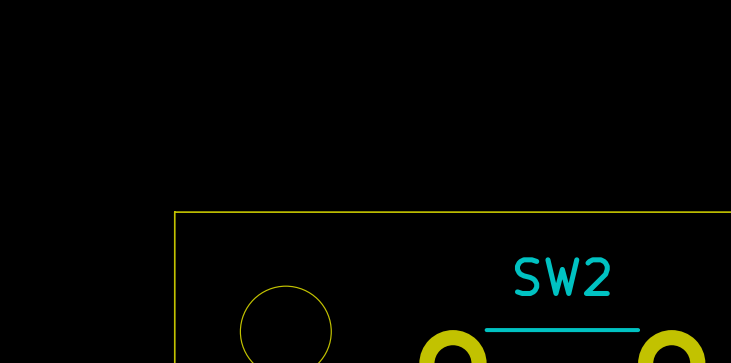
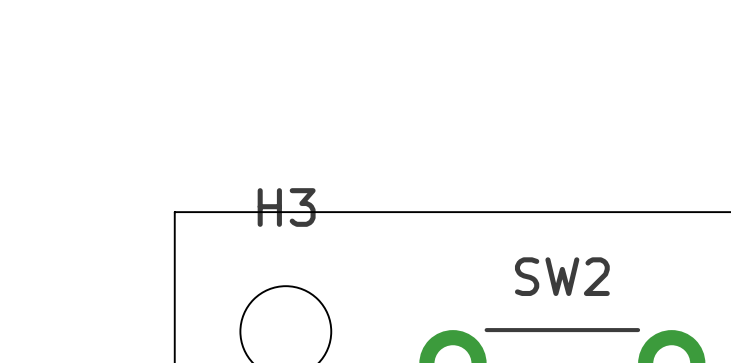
H3 name: none -> H3 (286, 207)

